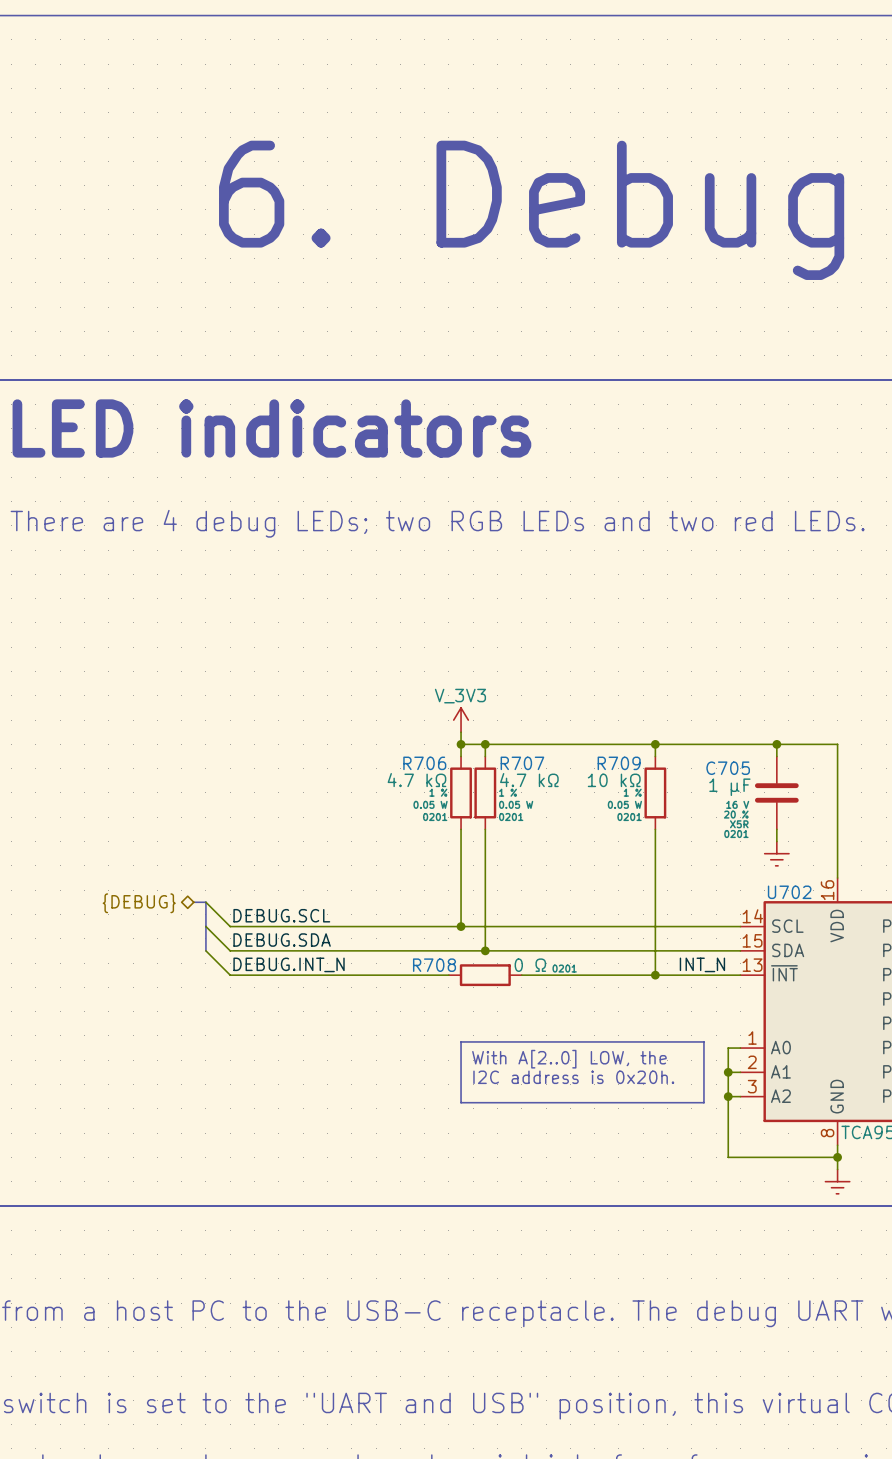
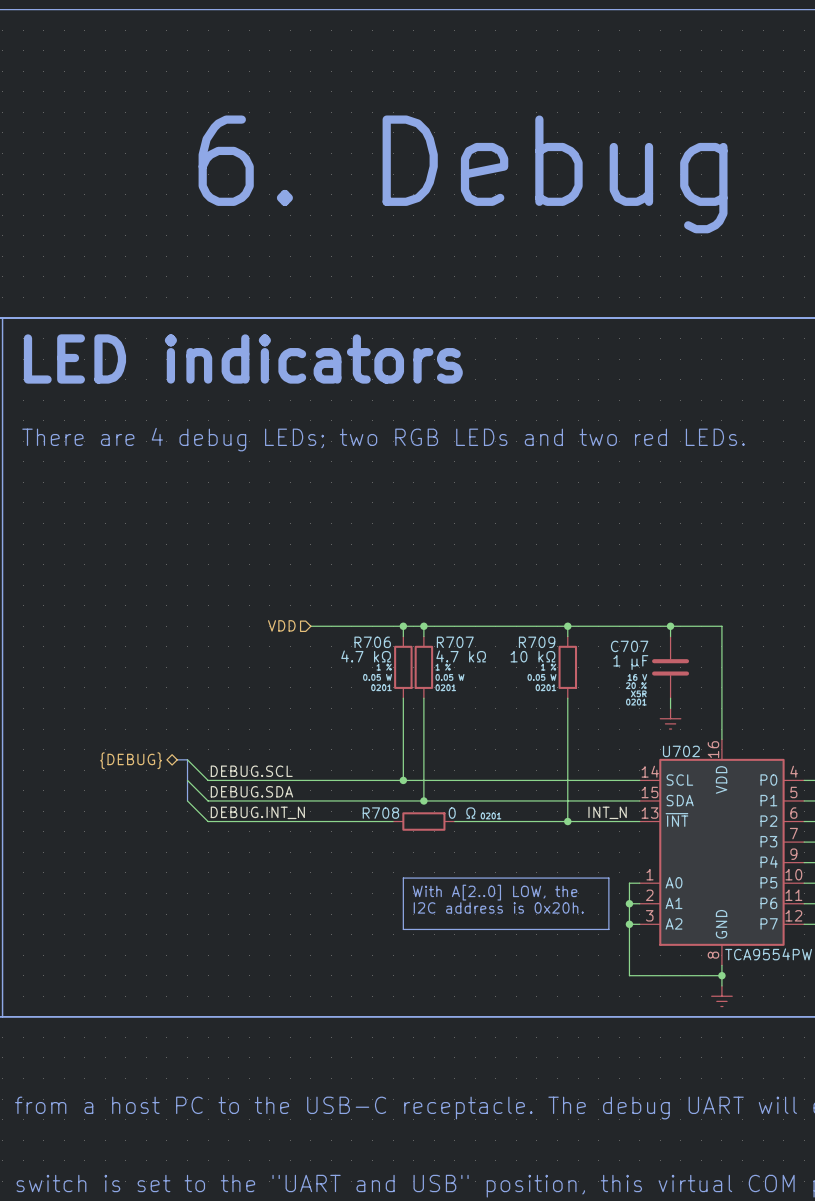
power symbol: V_3V3 (461, 720) -> none
wire: (461, 732) (461, 744) -> (310, 626) (403, 626)
hierarchical label: none -> VDD (281, 625)
C705 name: C705 (728, 768) -> C707 (629, 646)

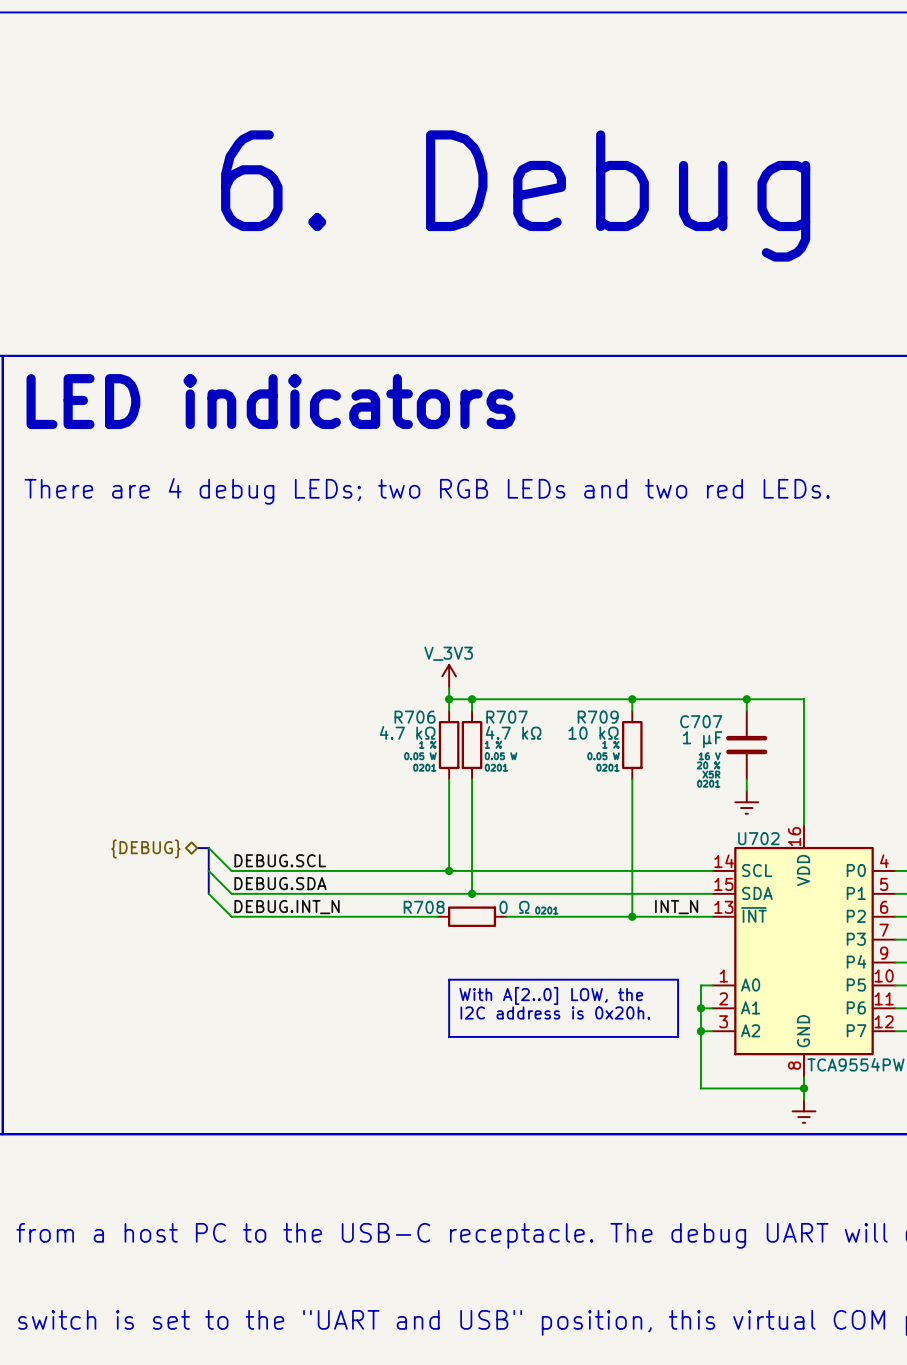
power symbol: none -> V_3V3 (449, 676)
hierarchical label: VDD (281, 625) -> none
wire: (310, 626) (403, 626) -> (449, 687) (449, 699)

